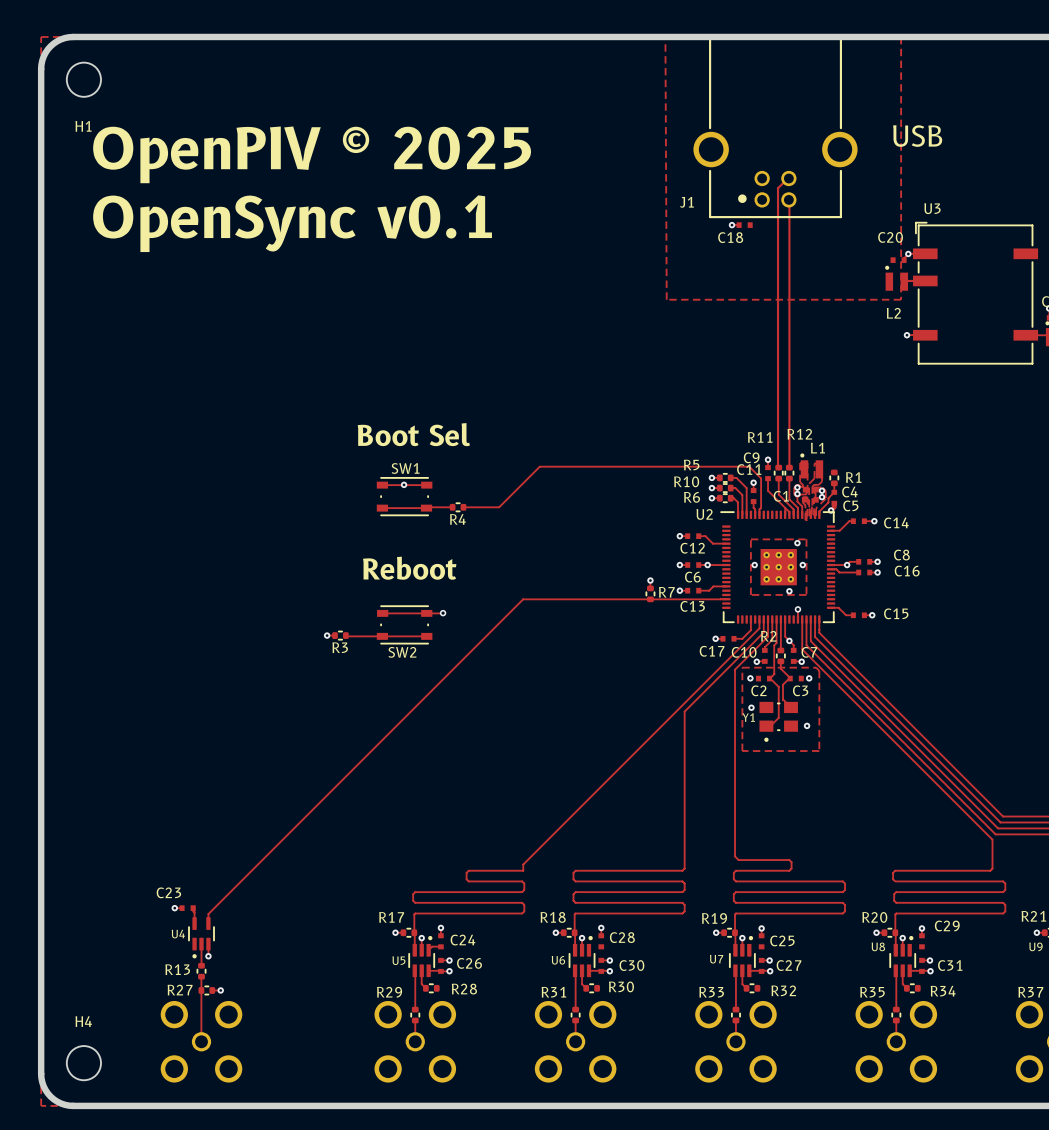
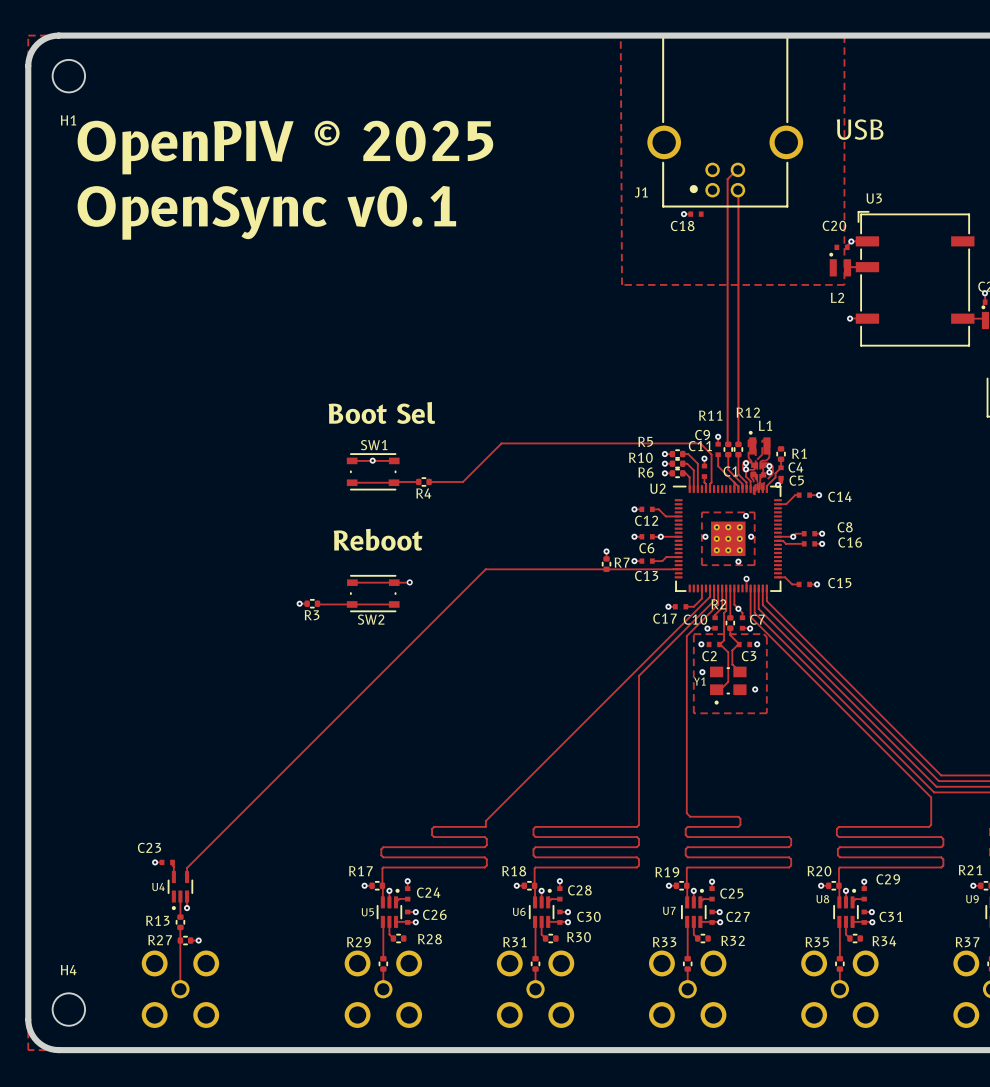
track: none -> (559, 899) (551, 899) (548, 902)
track: none -> (712, 899) (703, 899) (700, 902)
track: none -> (864, 899) (855, 899) (852, 902)

